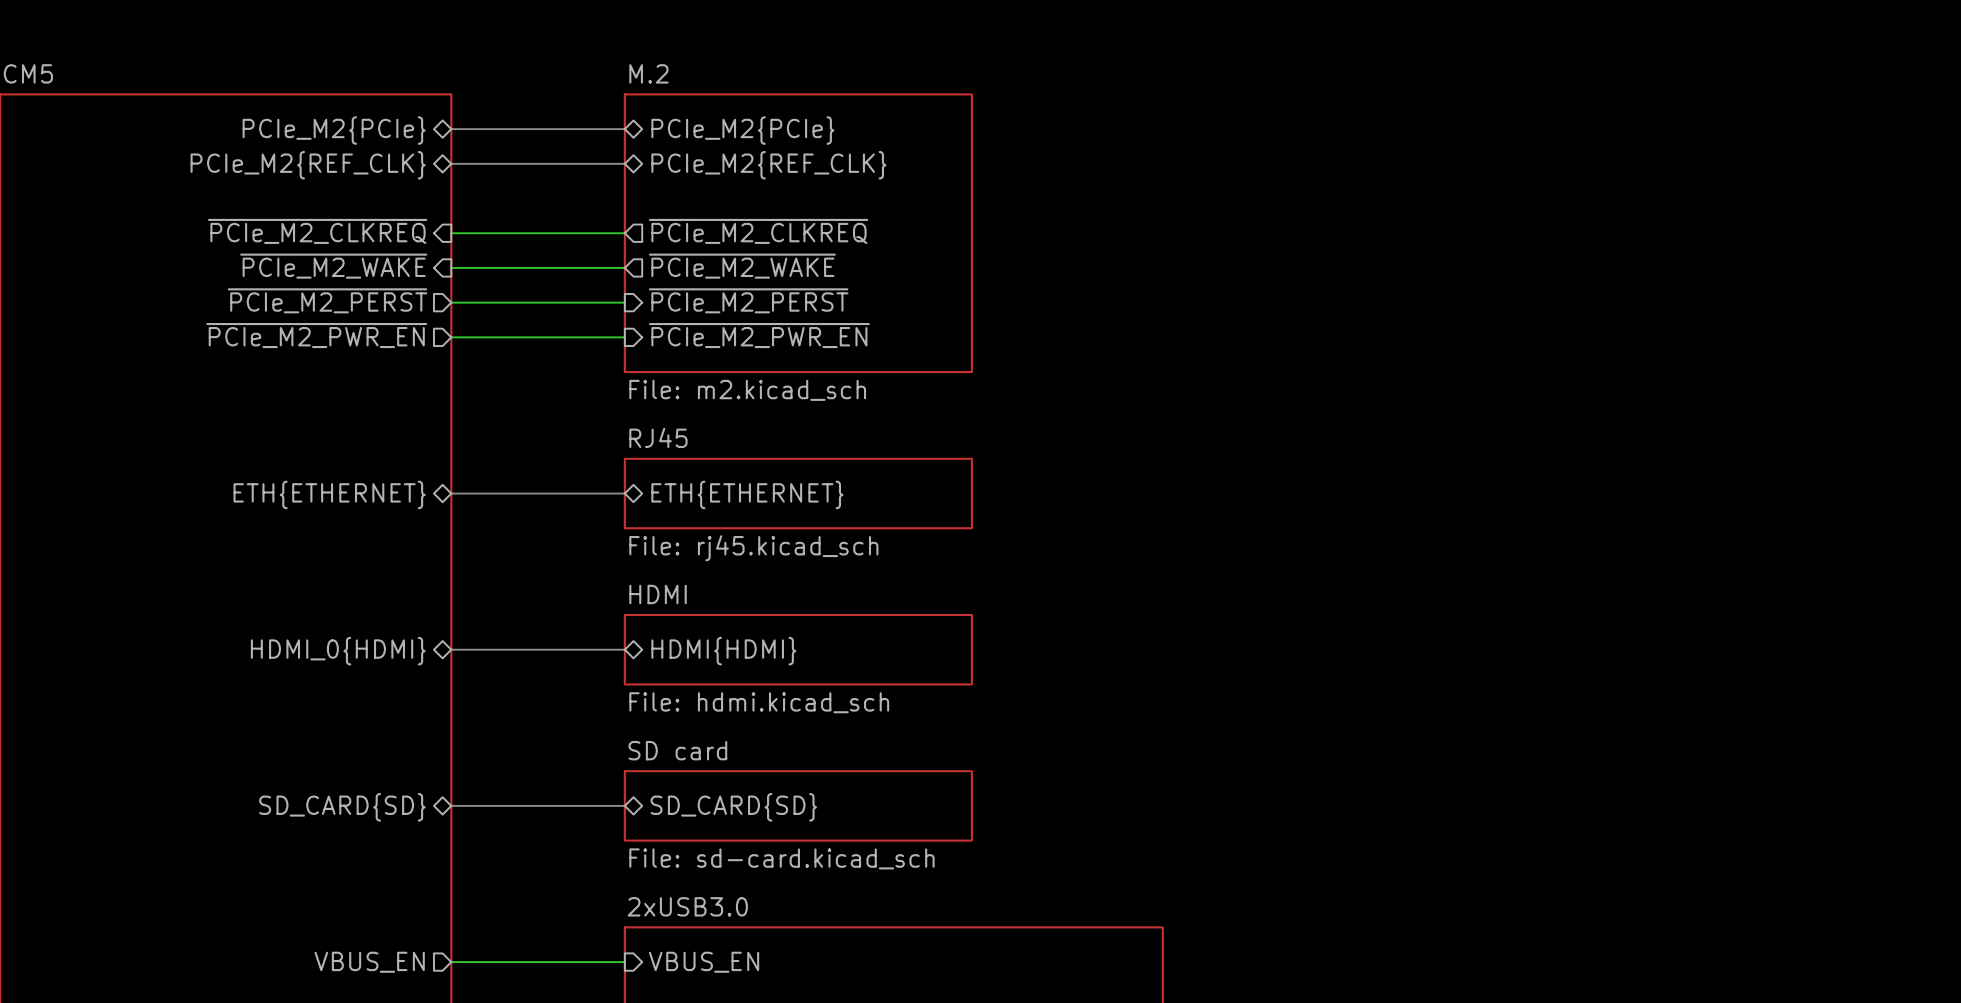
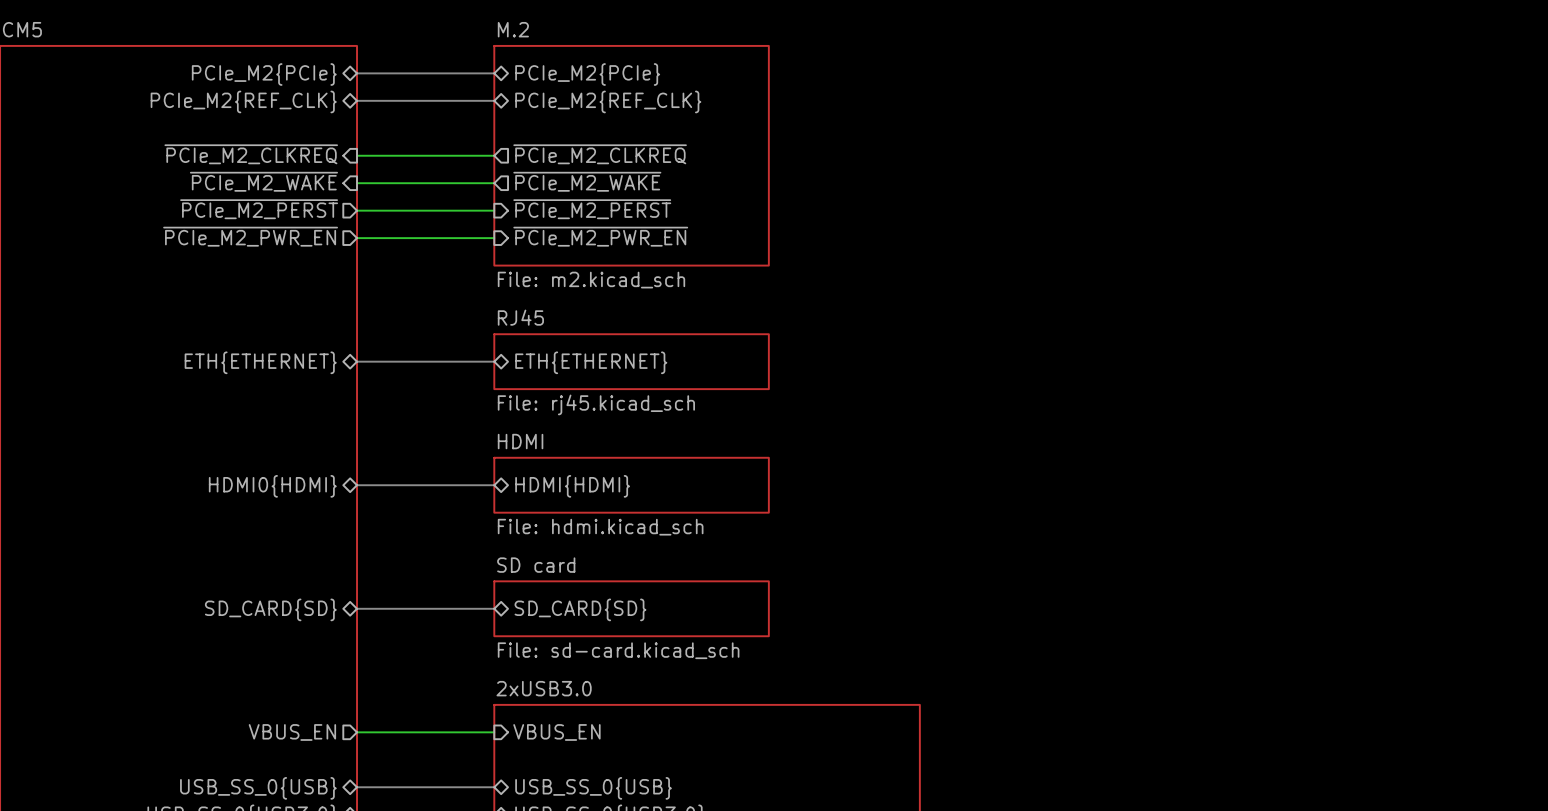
sheet pin: HDMI_0{HDMI} (338, 651) -> HDMI0{HDMI} (272, 486)

